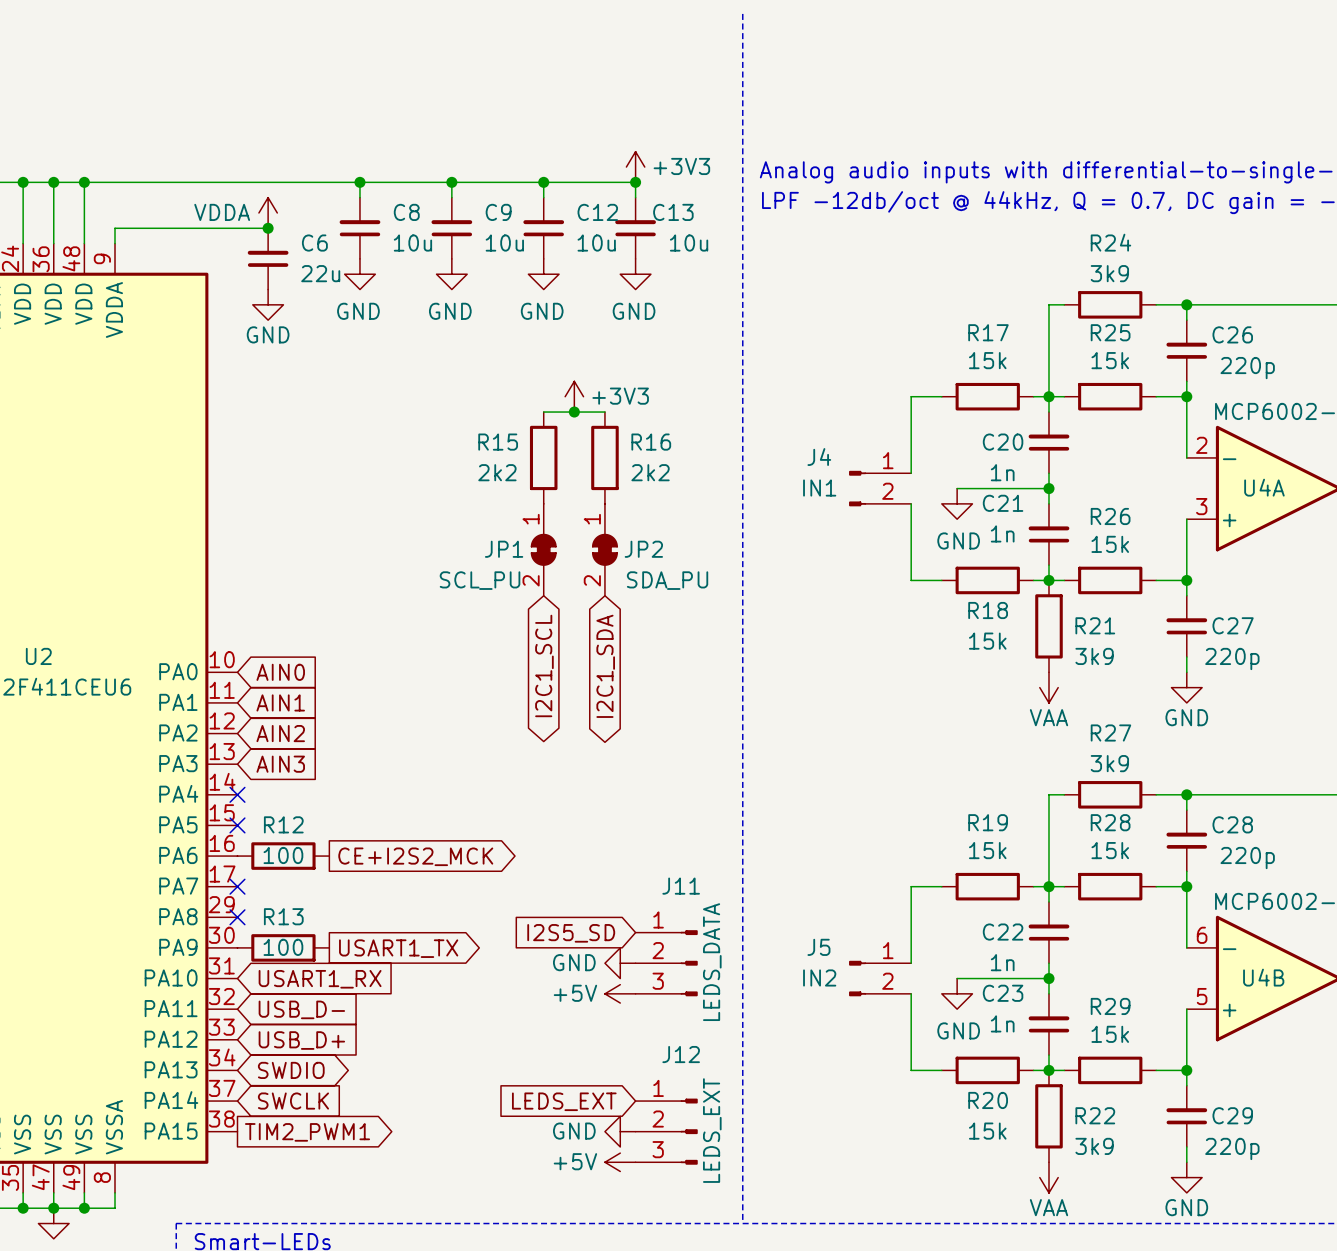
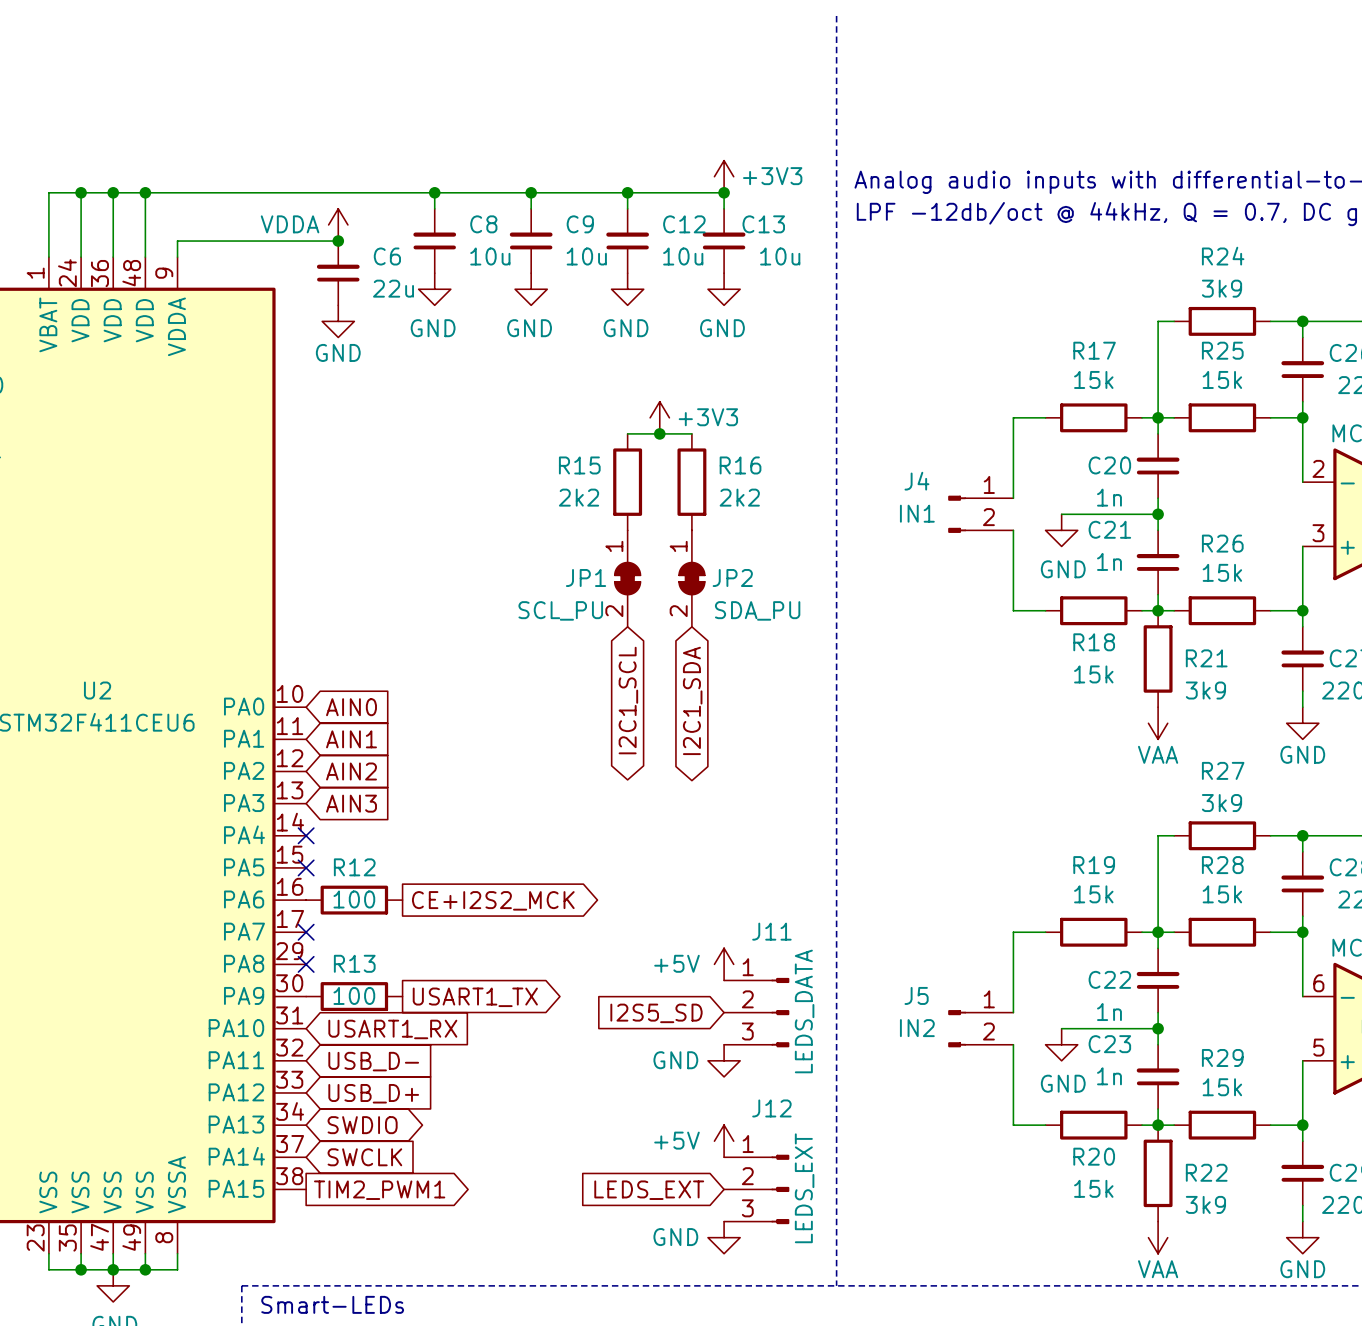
power symbol: none -> +5V (724, 964)
global label position: I2S5_SD (571, 933) -> I2S5_SD (656, 1013)
power symbol rotation: 0° (620, 963) -> 90° counterclockwise (724, 1060)
power symbol position: GND (620, 963) -> GND (724, 1060)
power symbol: +5V (620, 993) -> none
power symbol: none -> +5V (724, 1141)
global label position: LEDS_EXT (564, 1101) -> LEDS_EXT (649, 1190)
power symbol rotation: 0° (620, 1131) -> 90° counterclockwise (724, 1237)
power symbol position: GND (620, 1131) -> GND (724, 1237)
power symbol: +5V (620, 1162) -> none

